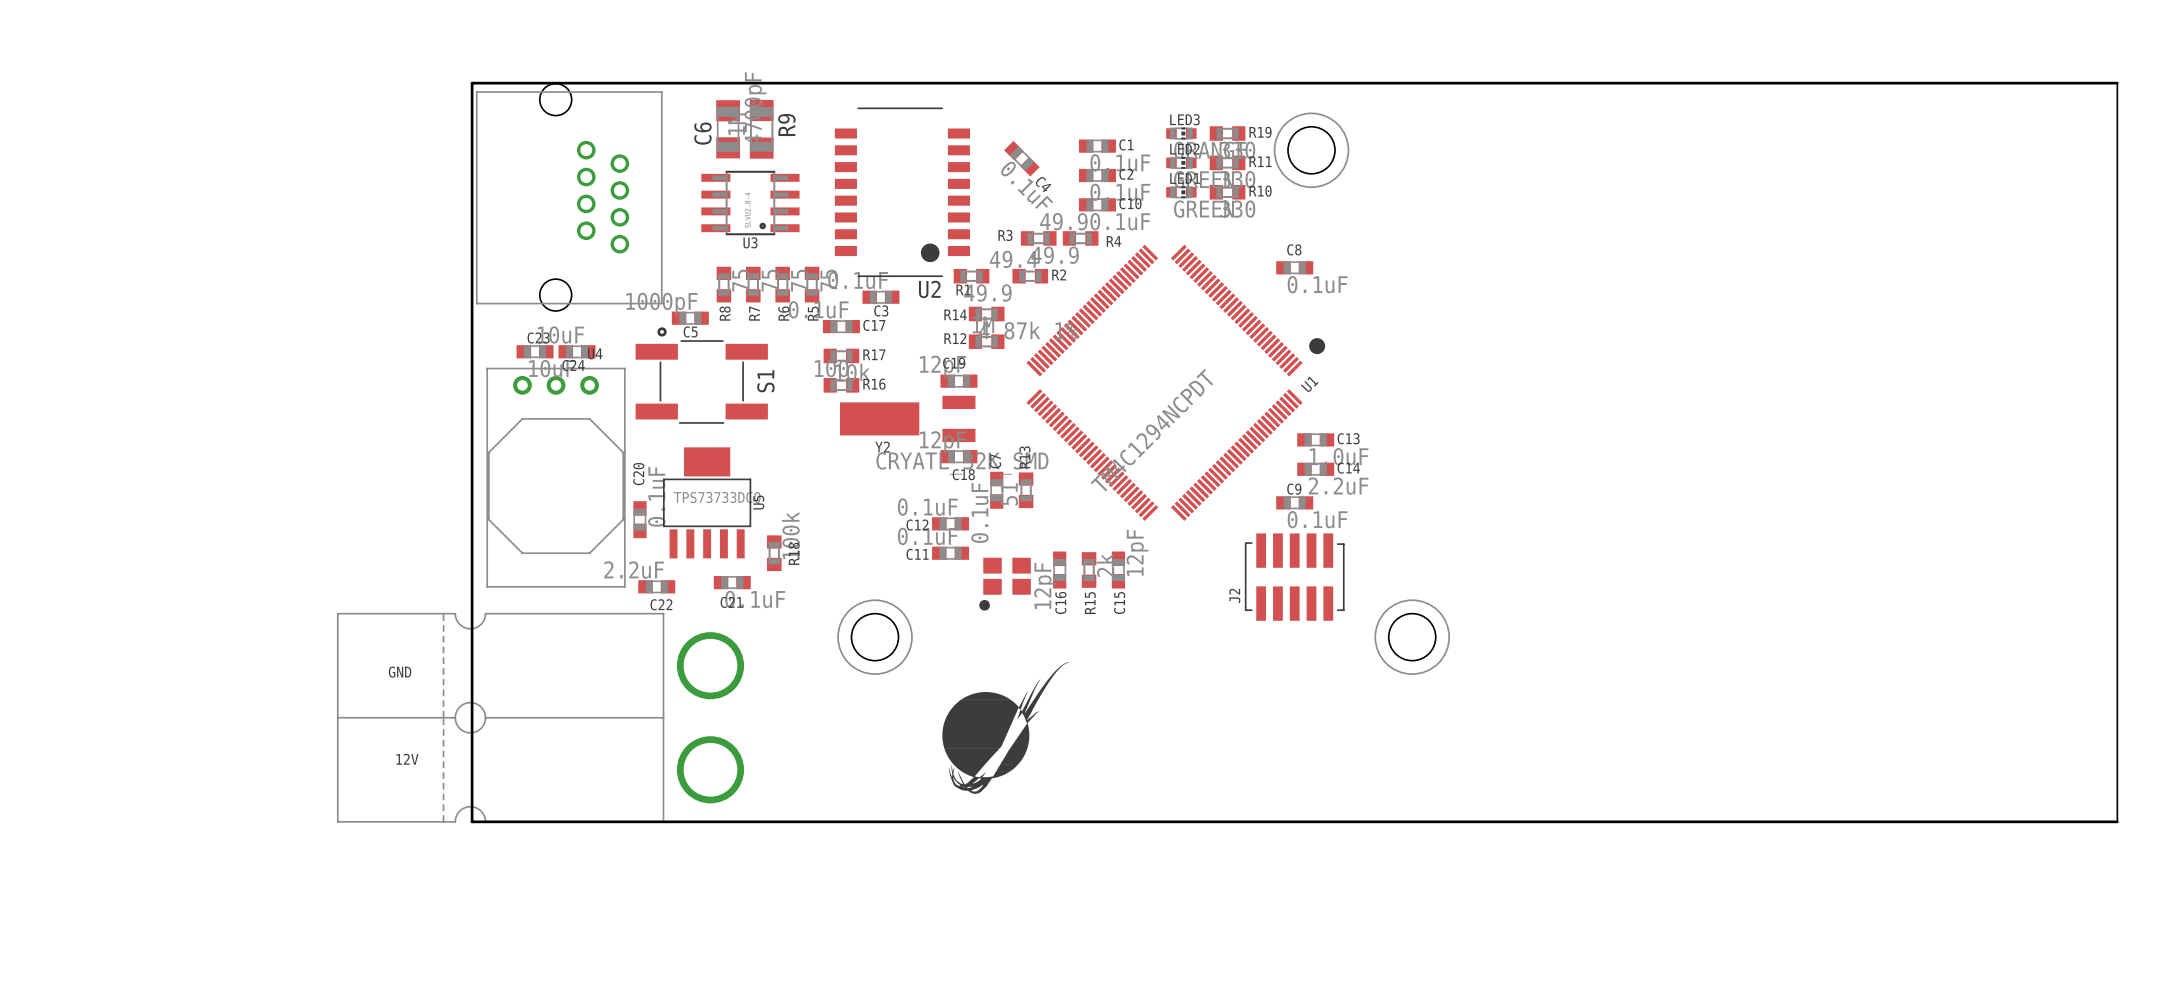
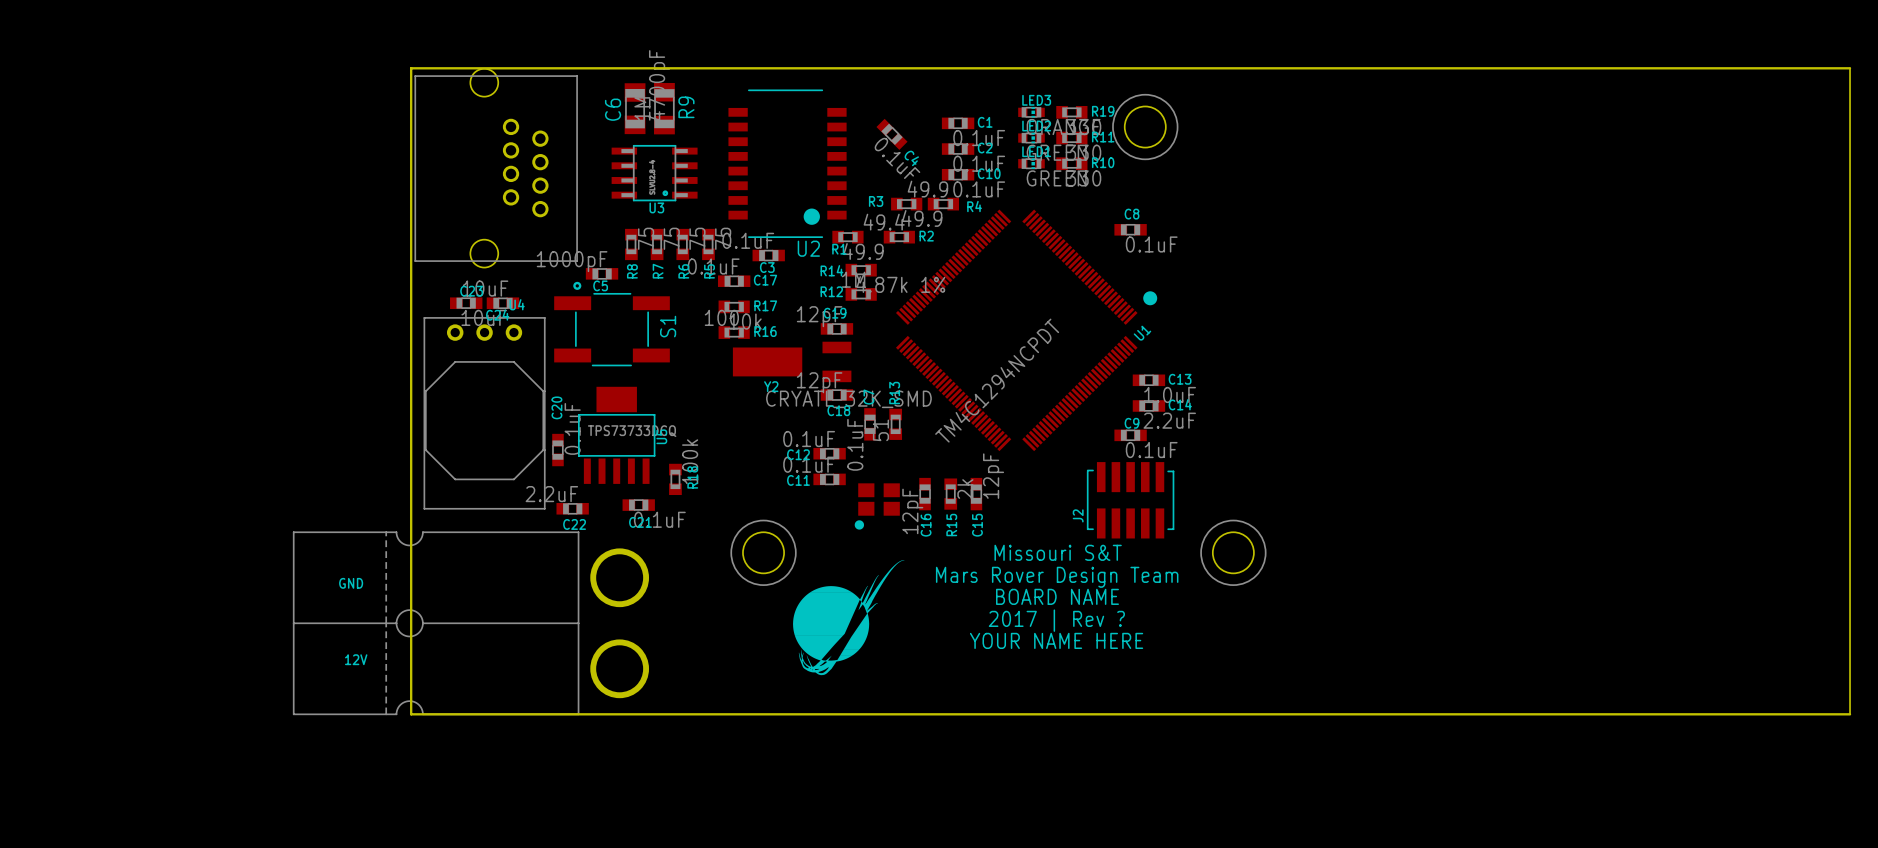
text: none -> Missouri S&T (1058, 552)
text: none -> Mars Rover Design Team (1057, 577)
text: none -> BOARD NAME (1057, 596)
text: none -> 2017 | Rev ? (1056, 620)
drawing position: (1006, 728) -> (848, 617)
text: none -> YOUR NAME HERE (1056, 640)

